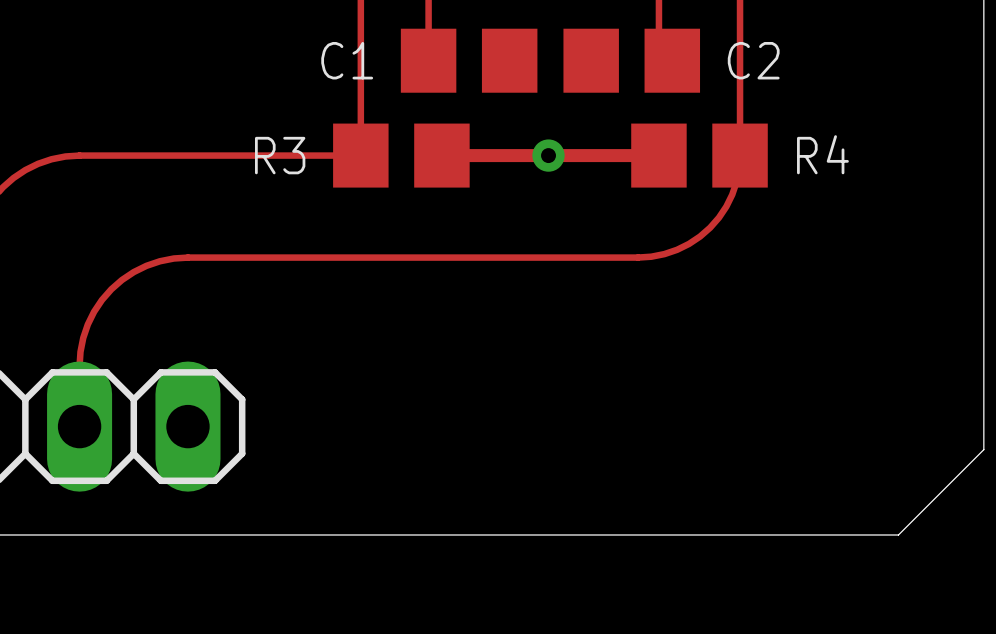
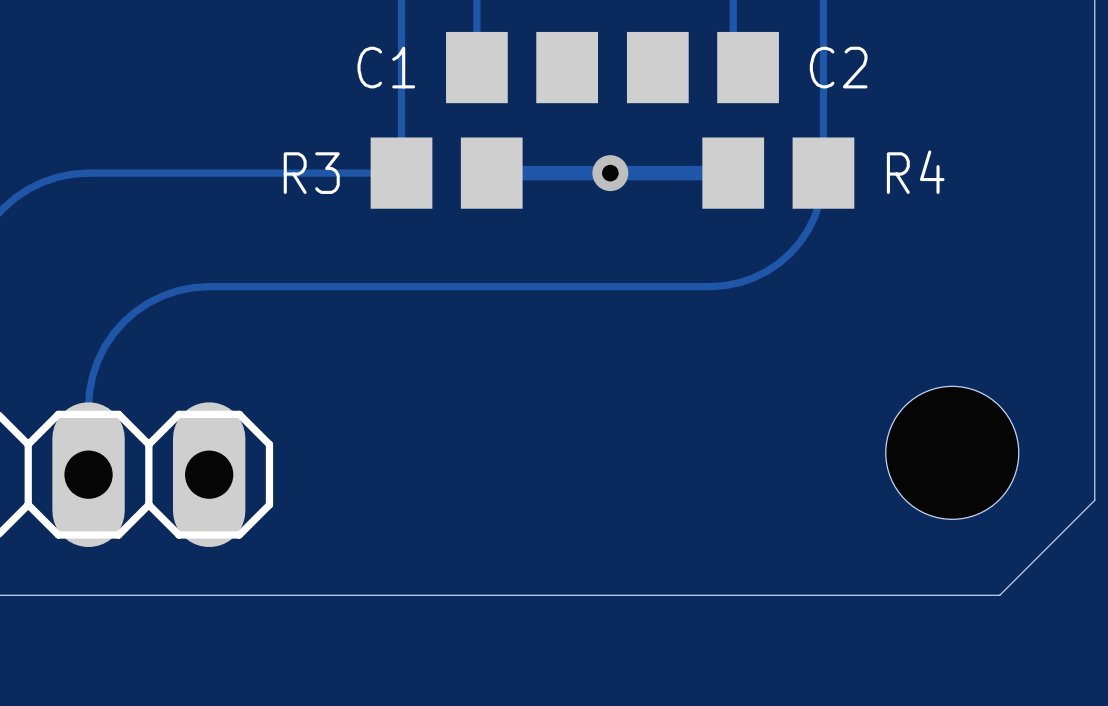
hole: none -> (952, 452)

